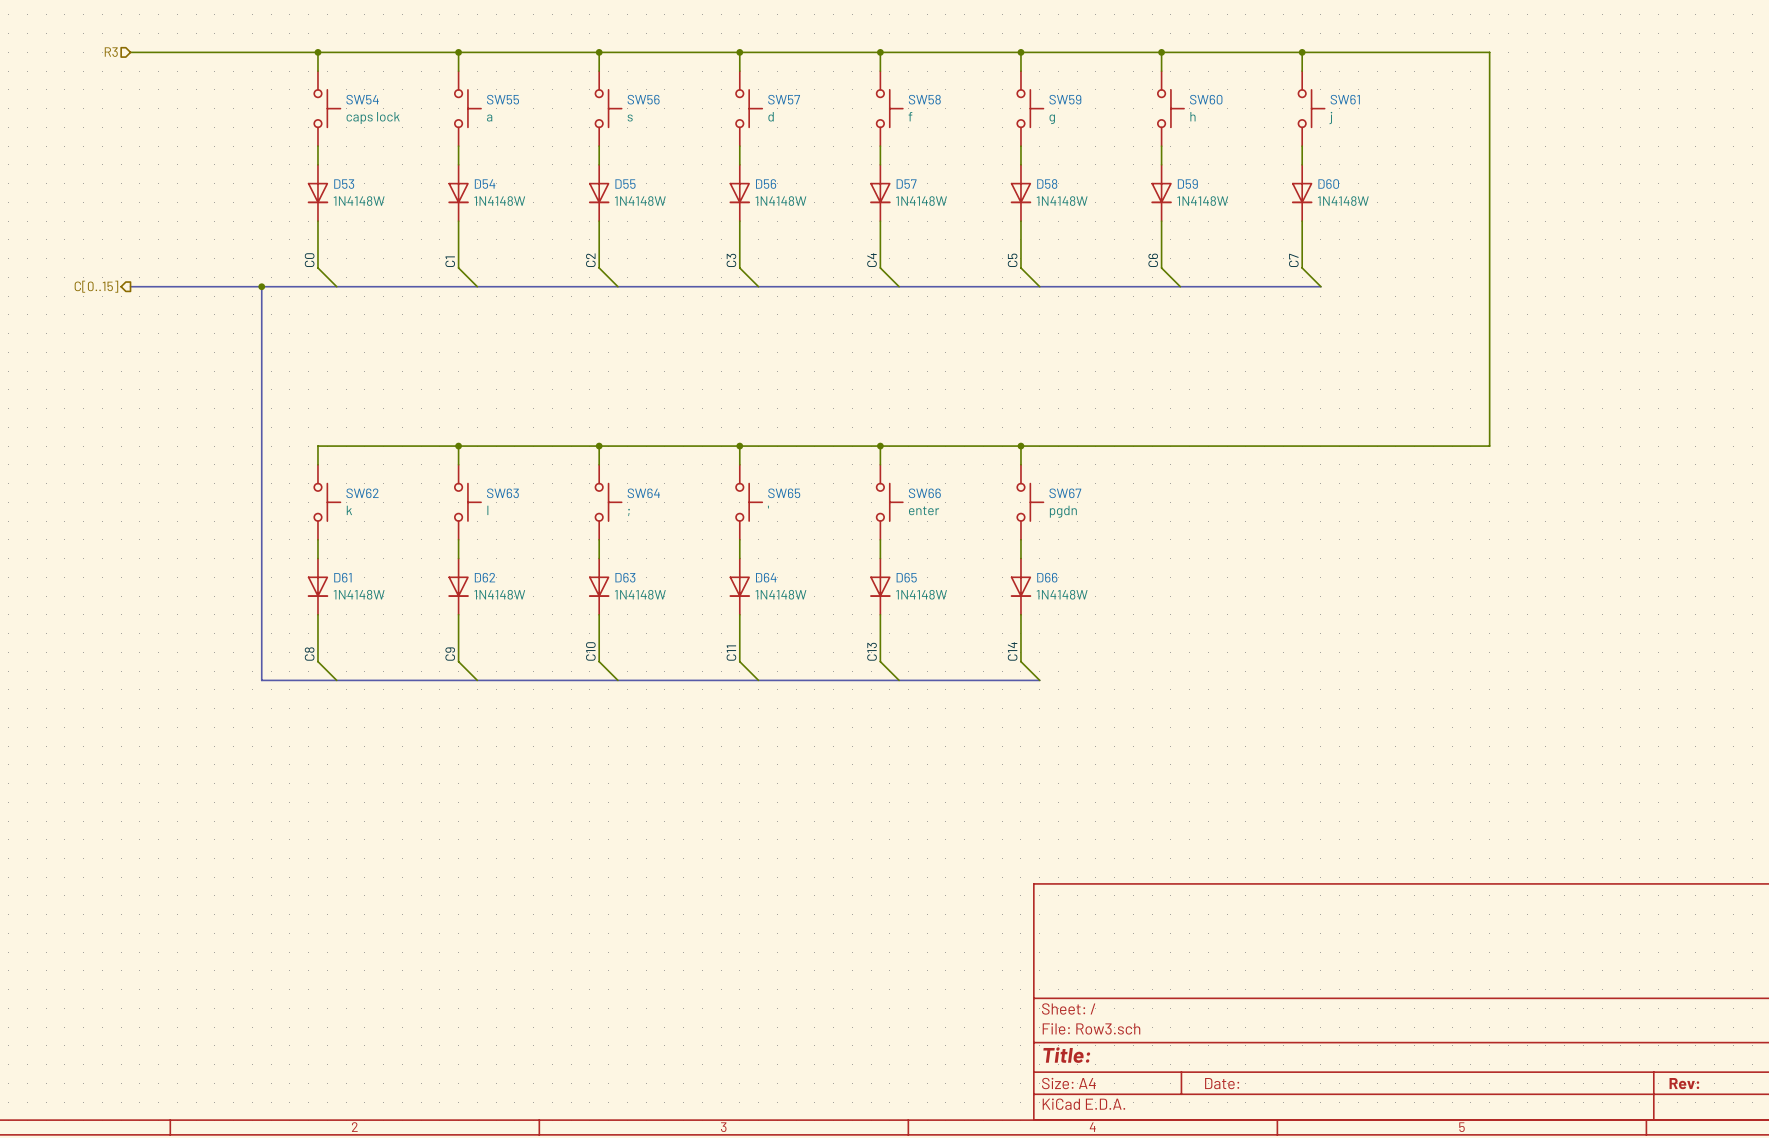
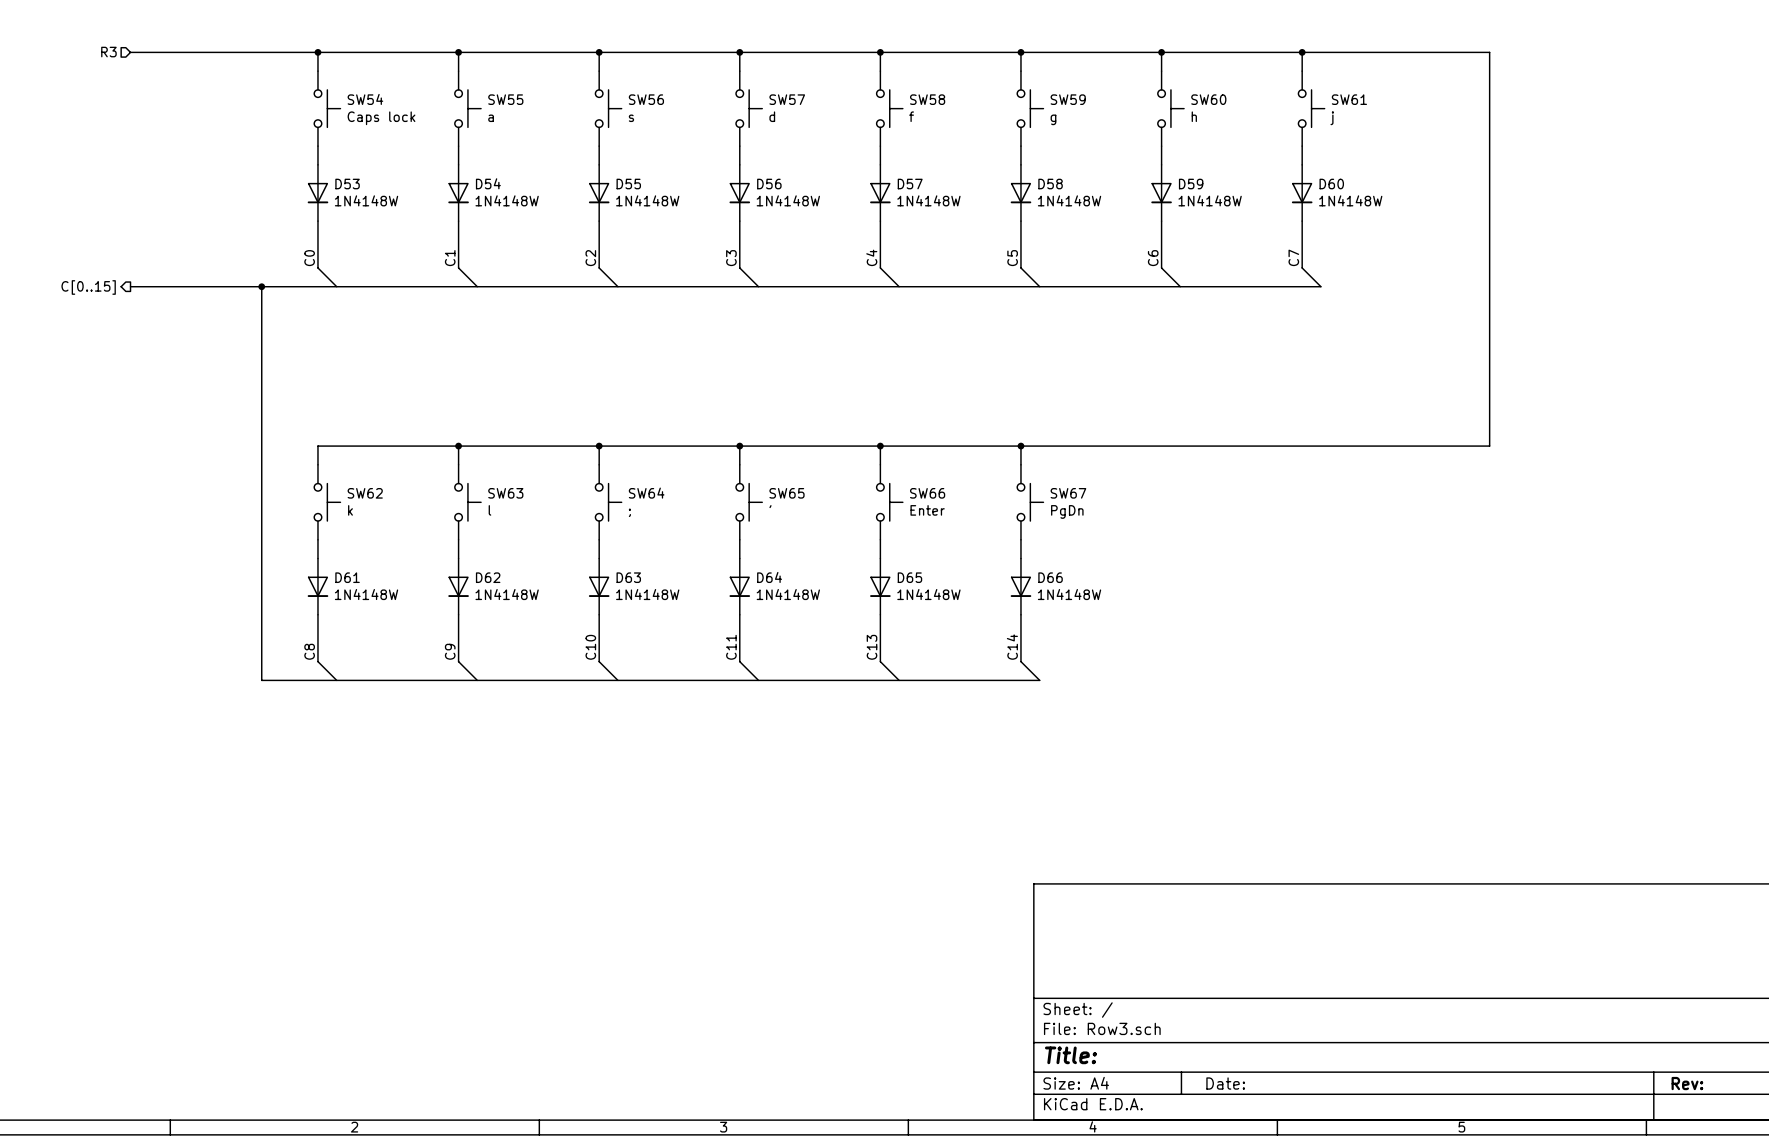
SW54 value: caps lock (373, 118) -> Caps lock (381, 118)
SW66 value: enter (924, 510) -> Enter (927, 510)
SW67 value: pgdn (1063, 511) -> PgDn (1067, 511)

